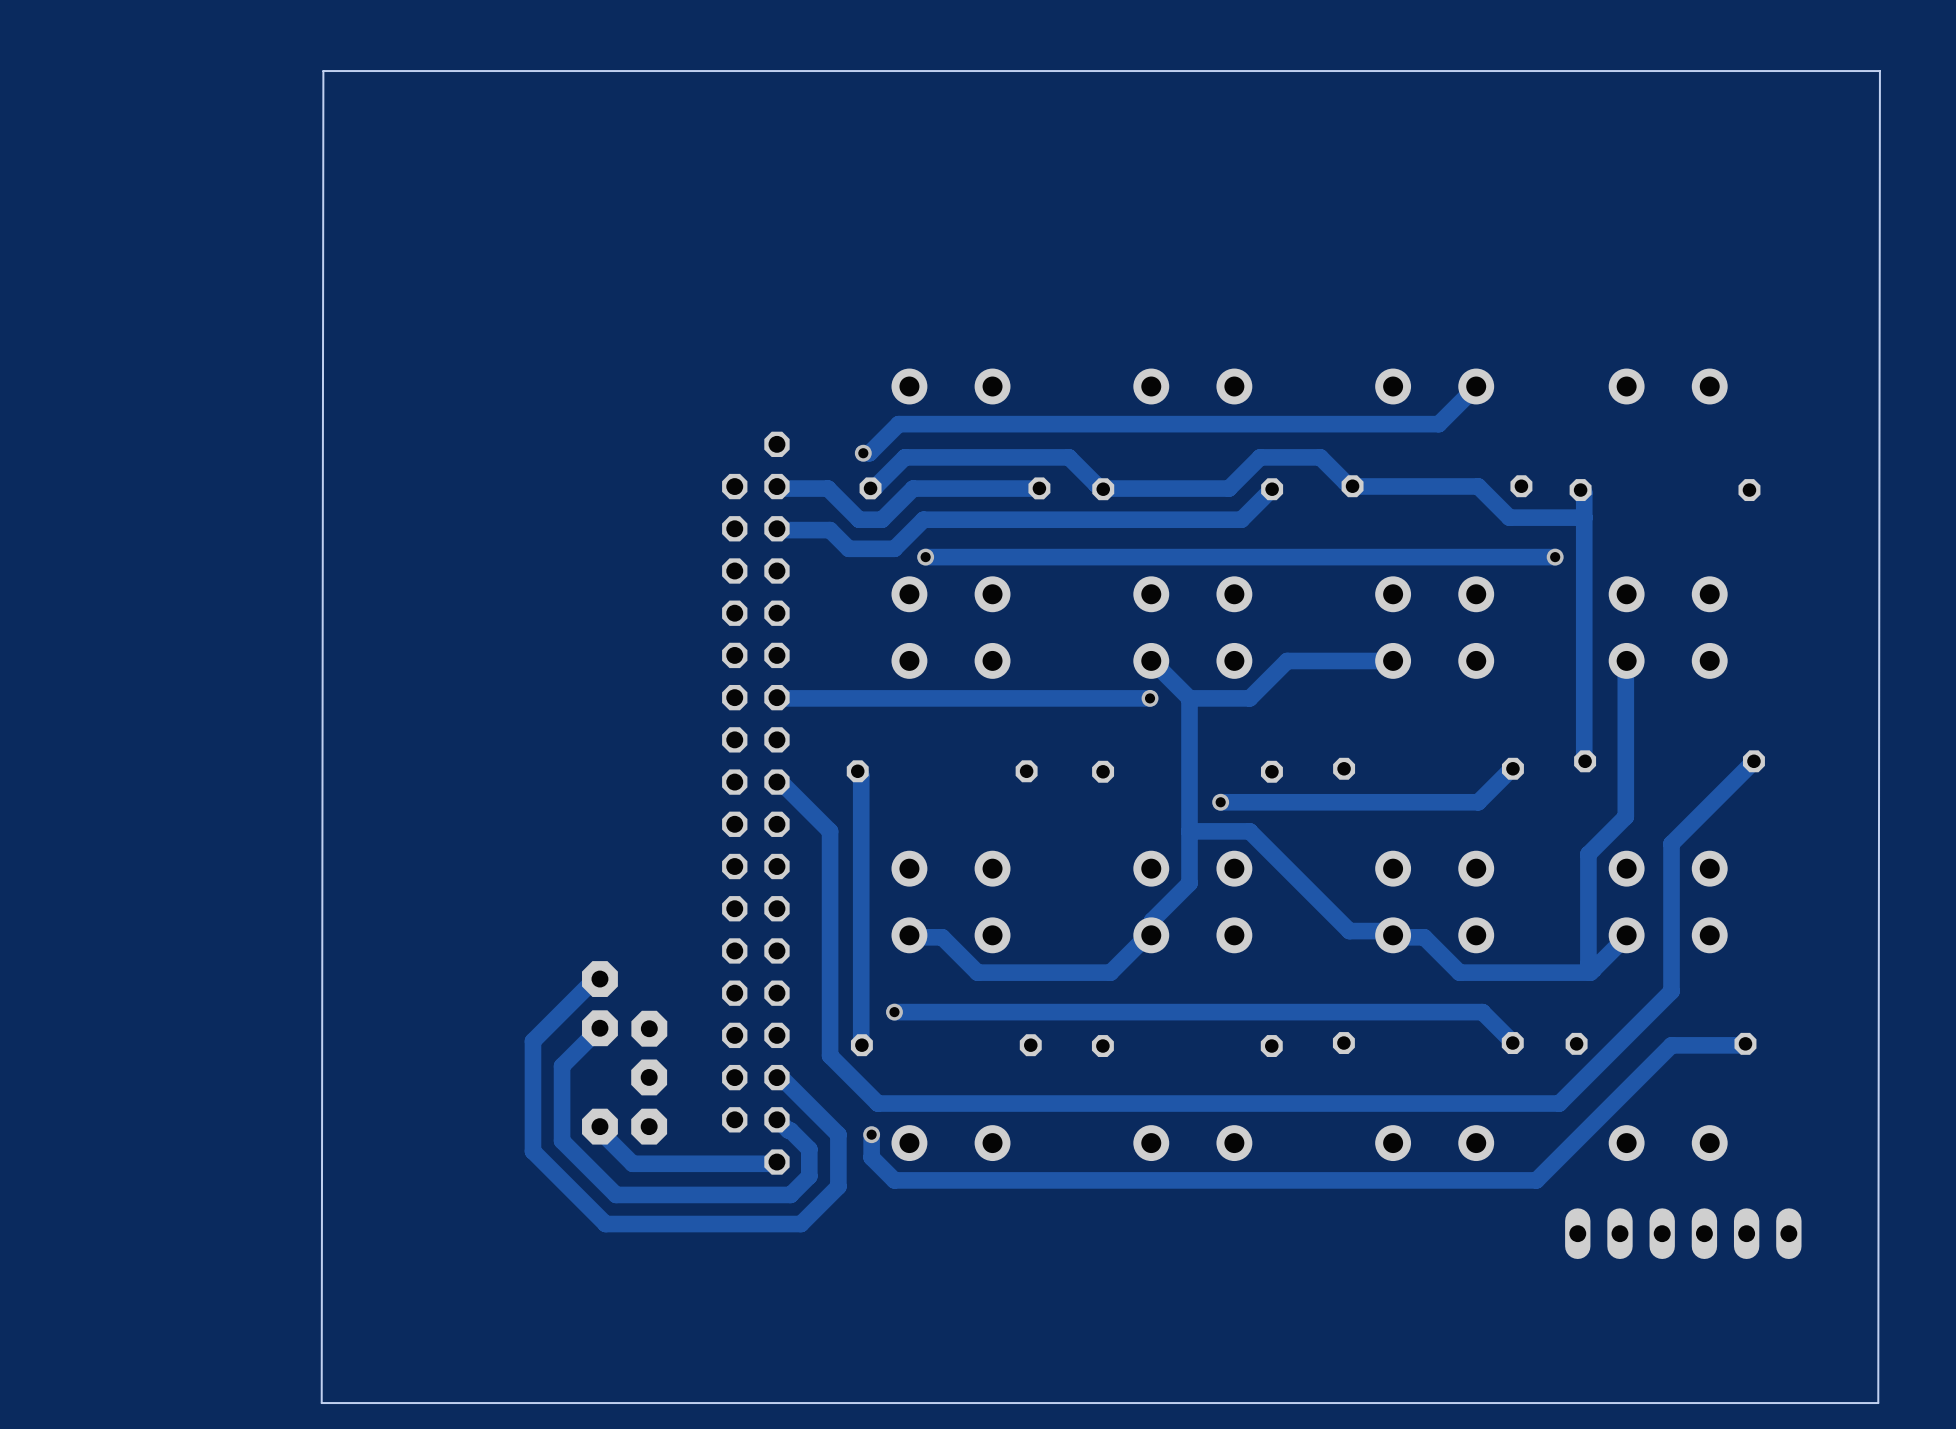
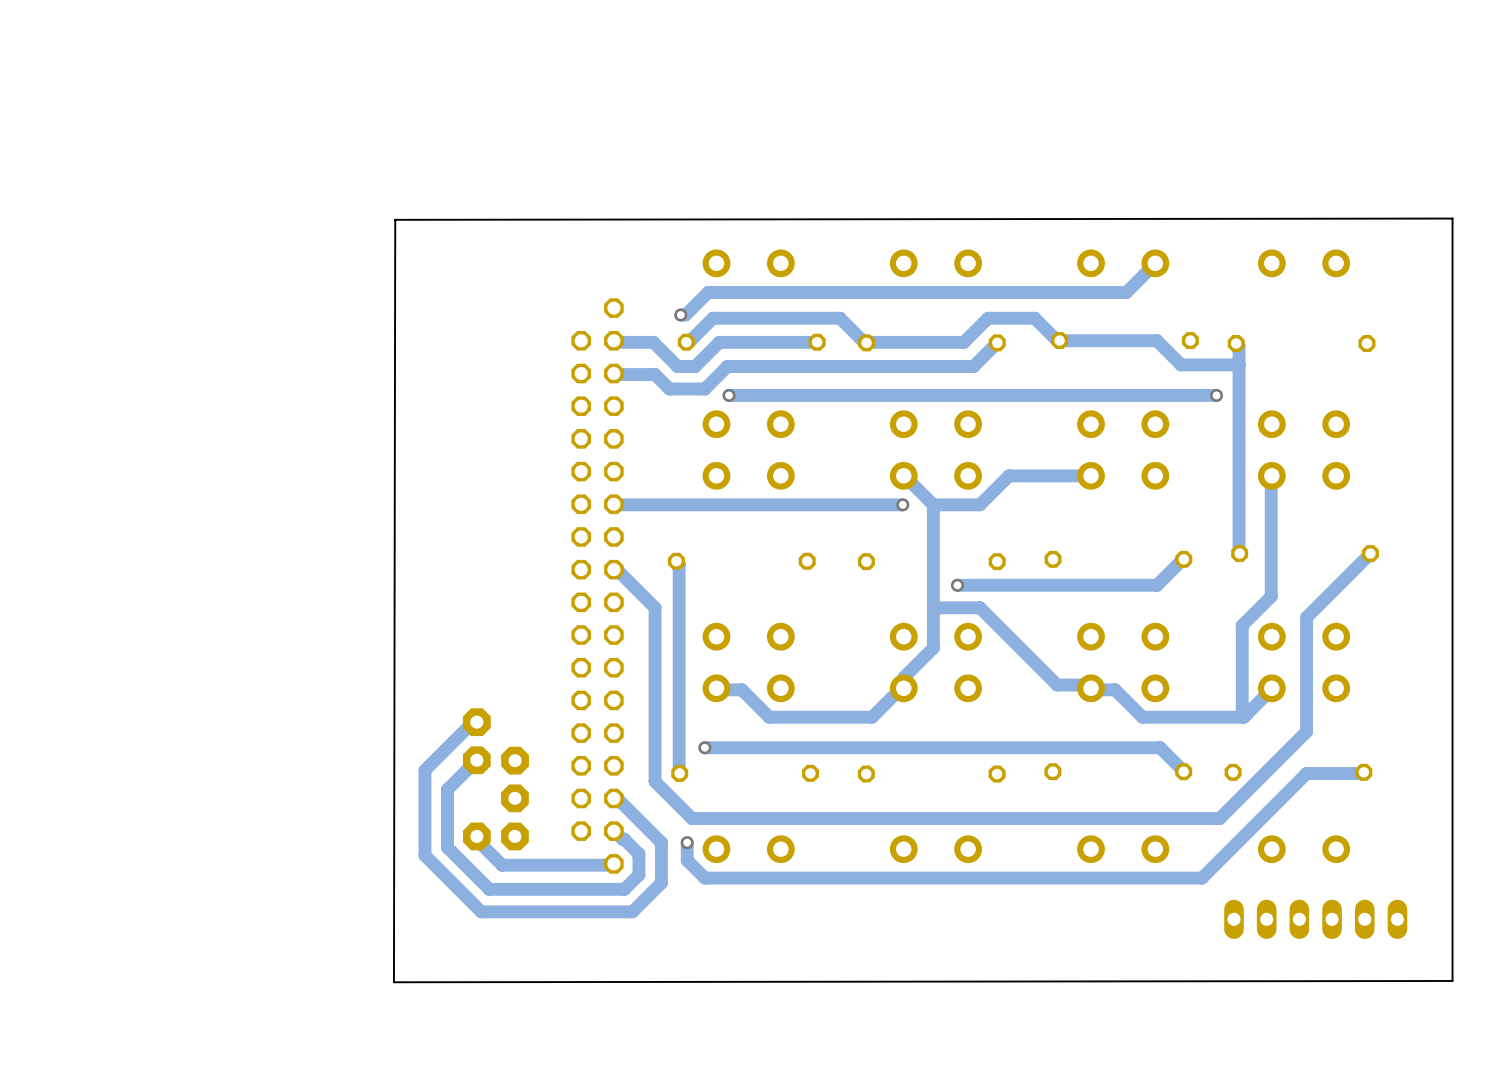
board edge: (1879, 71) (323, 71) (321, 1403) (1878, 1403) (1879, 71) -> (1452, 218) (1452, 980) (393, 982) (395, 219) (1452, 218)

